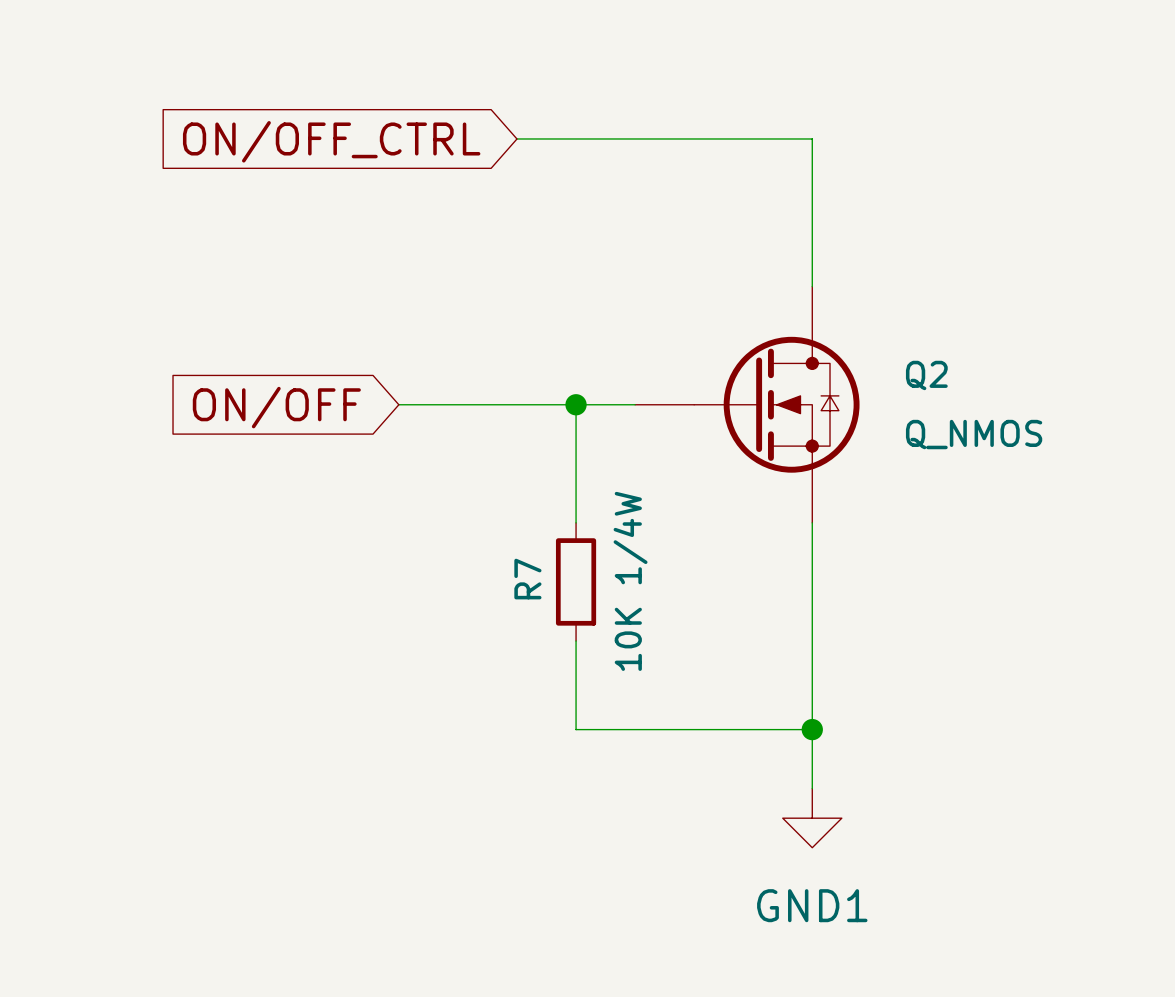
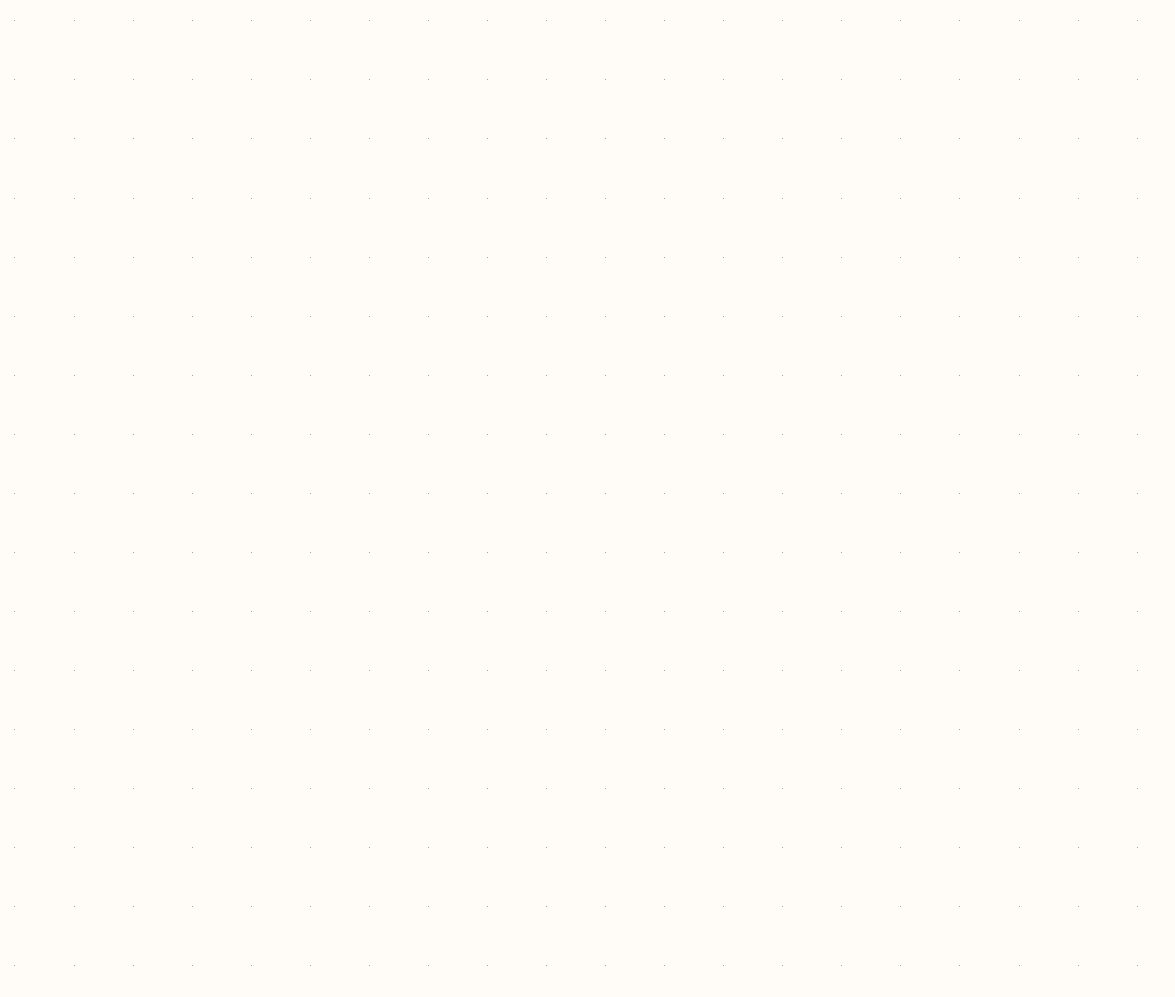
wire: (516, 138) (812, 138) (812, 286) -> none
global label: ON/OFF_CTRL (331, 141) -> none
wire: (398, 404) (635, 404) -> none
wire: (576, 404) (576, 522) -> none
junction: (576, 404) -> none
Q2: Q_NMOS (747, 404) -> none
global label: ON/OFF (276, 407) -> none
wire: (812, 522) (812, 788) -> none
R7: 10K 1/4W (576, 581) -> none
wire: (576, 641) (576, 729) (812, 729) -> none
junction: (812, 729) -> none
power symbol: GND1 (812, 818) -> none

